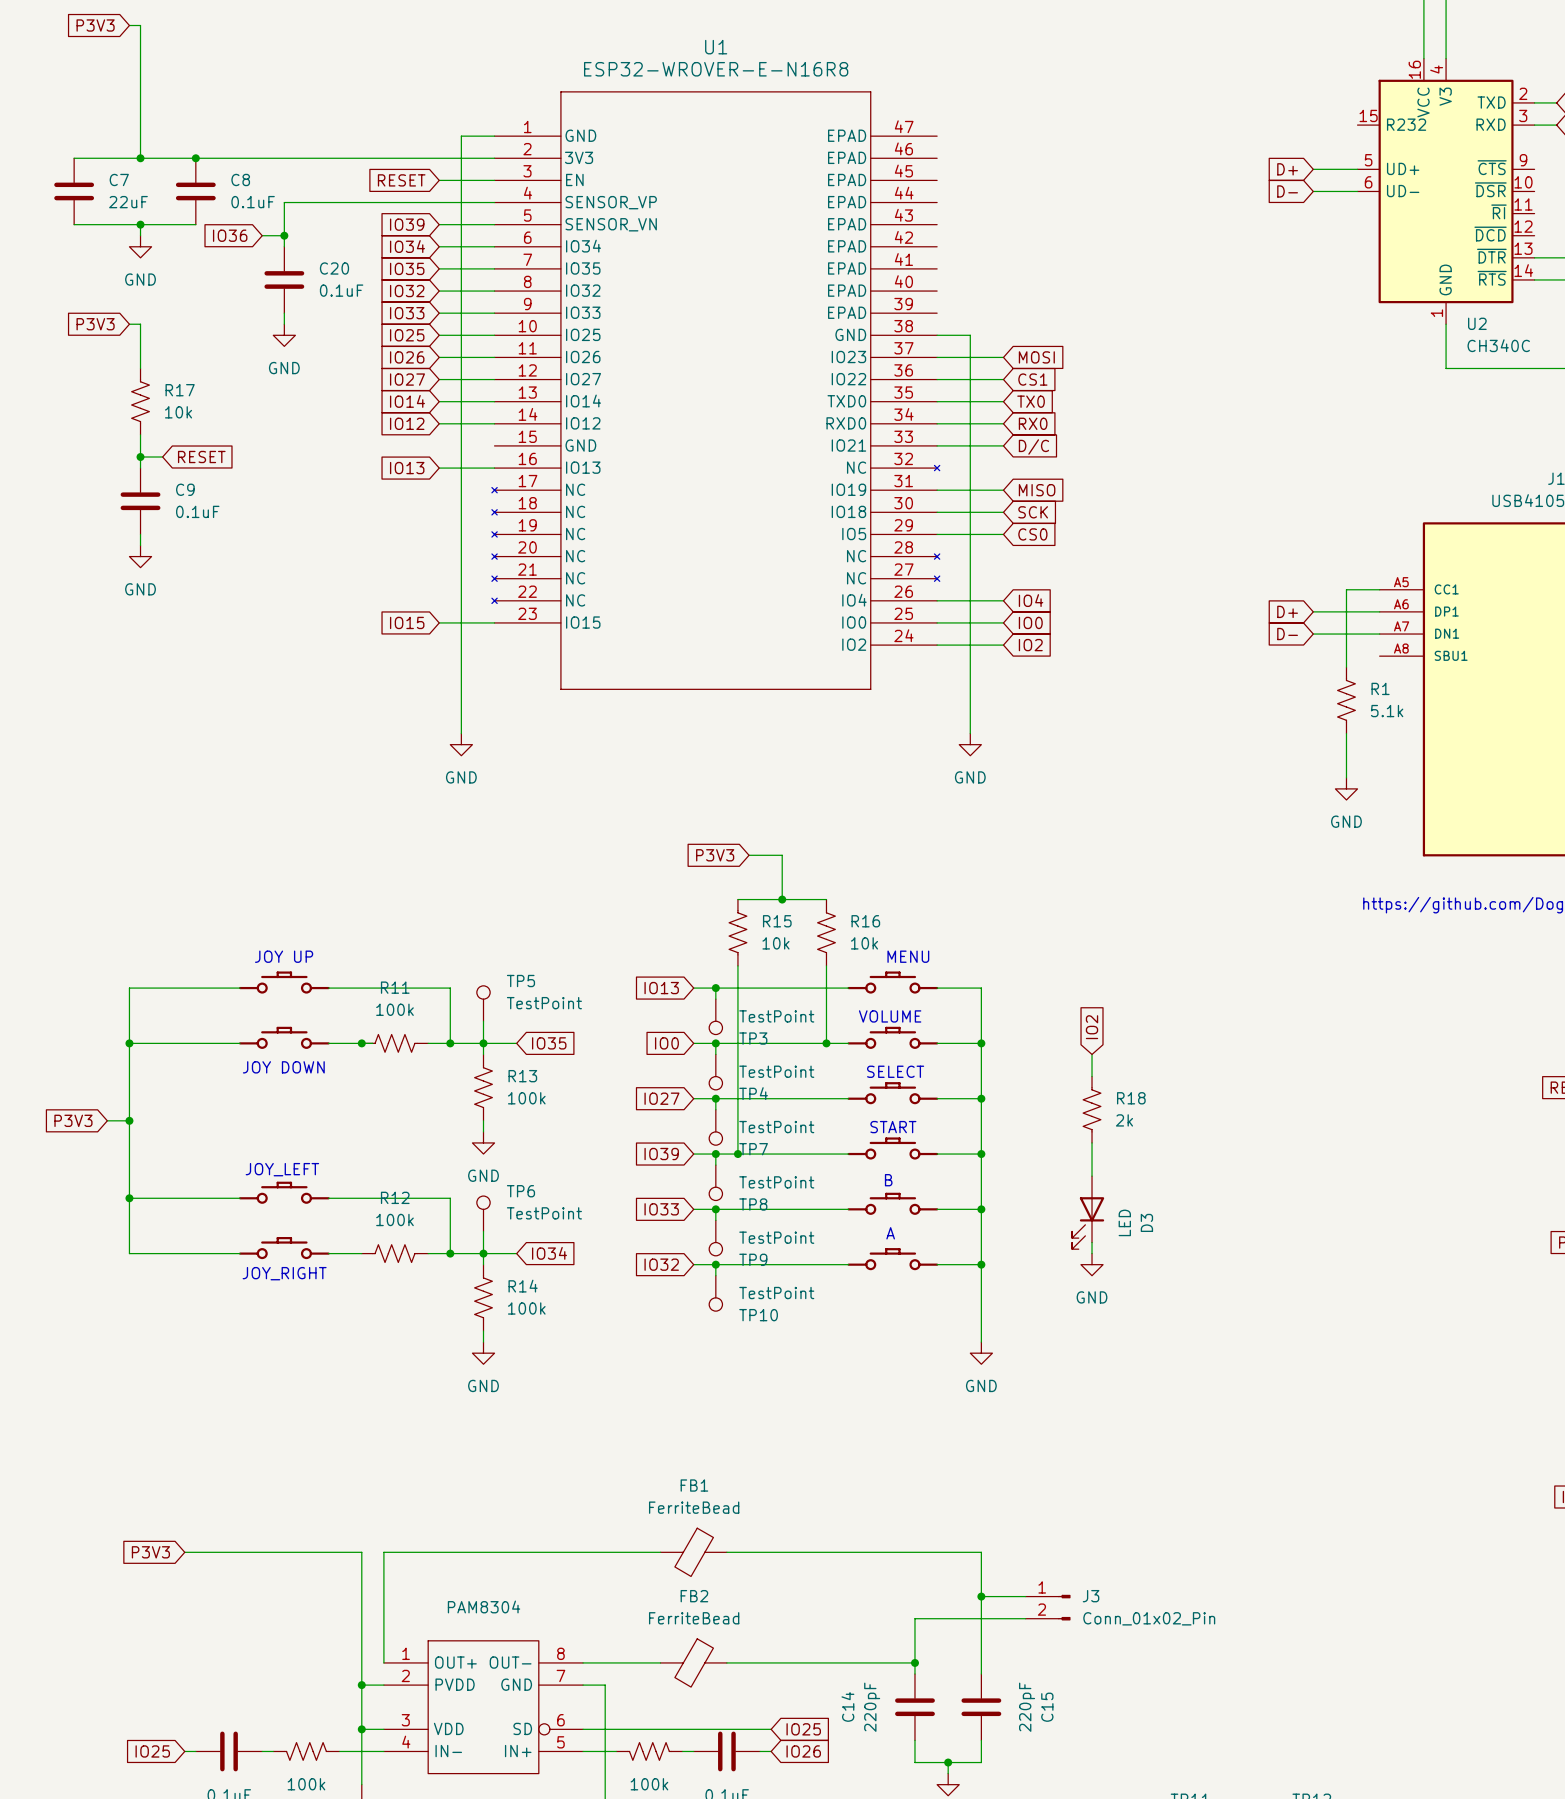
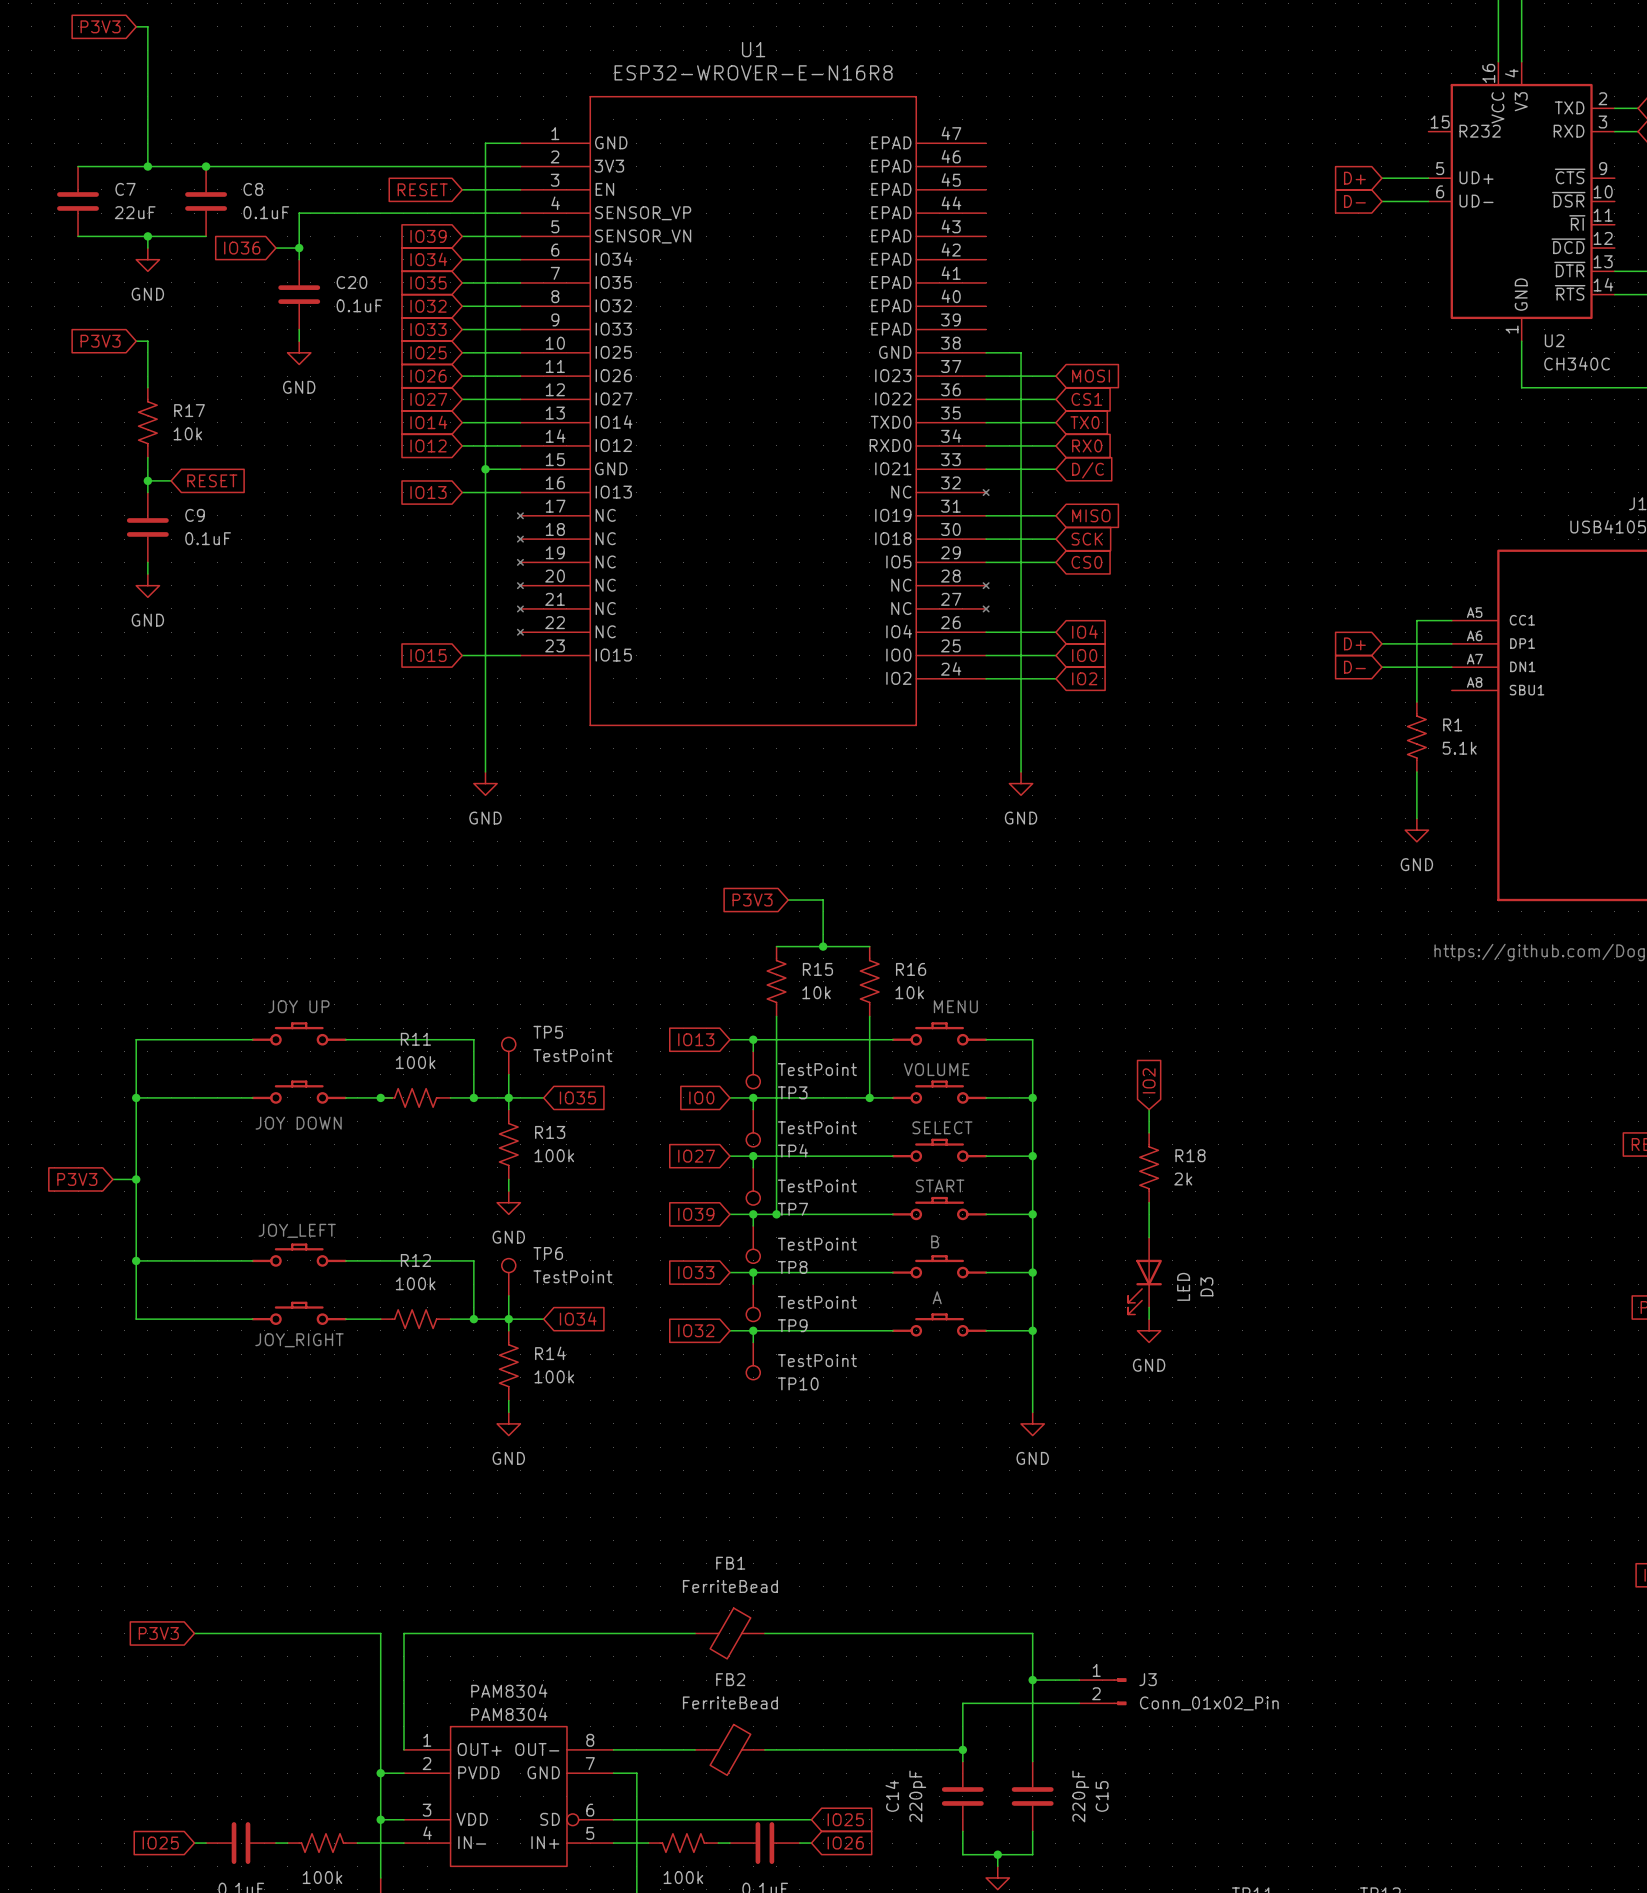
wire: none -> (485, 469) (520, 469)
junction: none -> (485, 469)
PAM8304 value: none -> PAM8304 (509, 1714)

